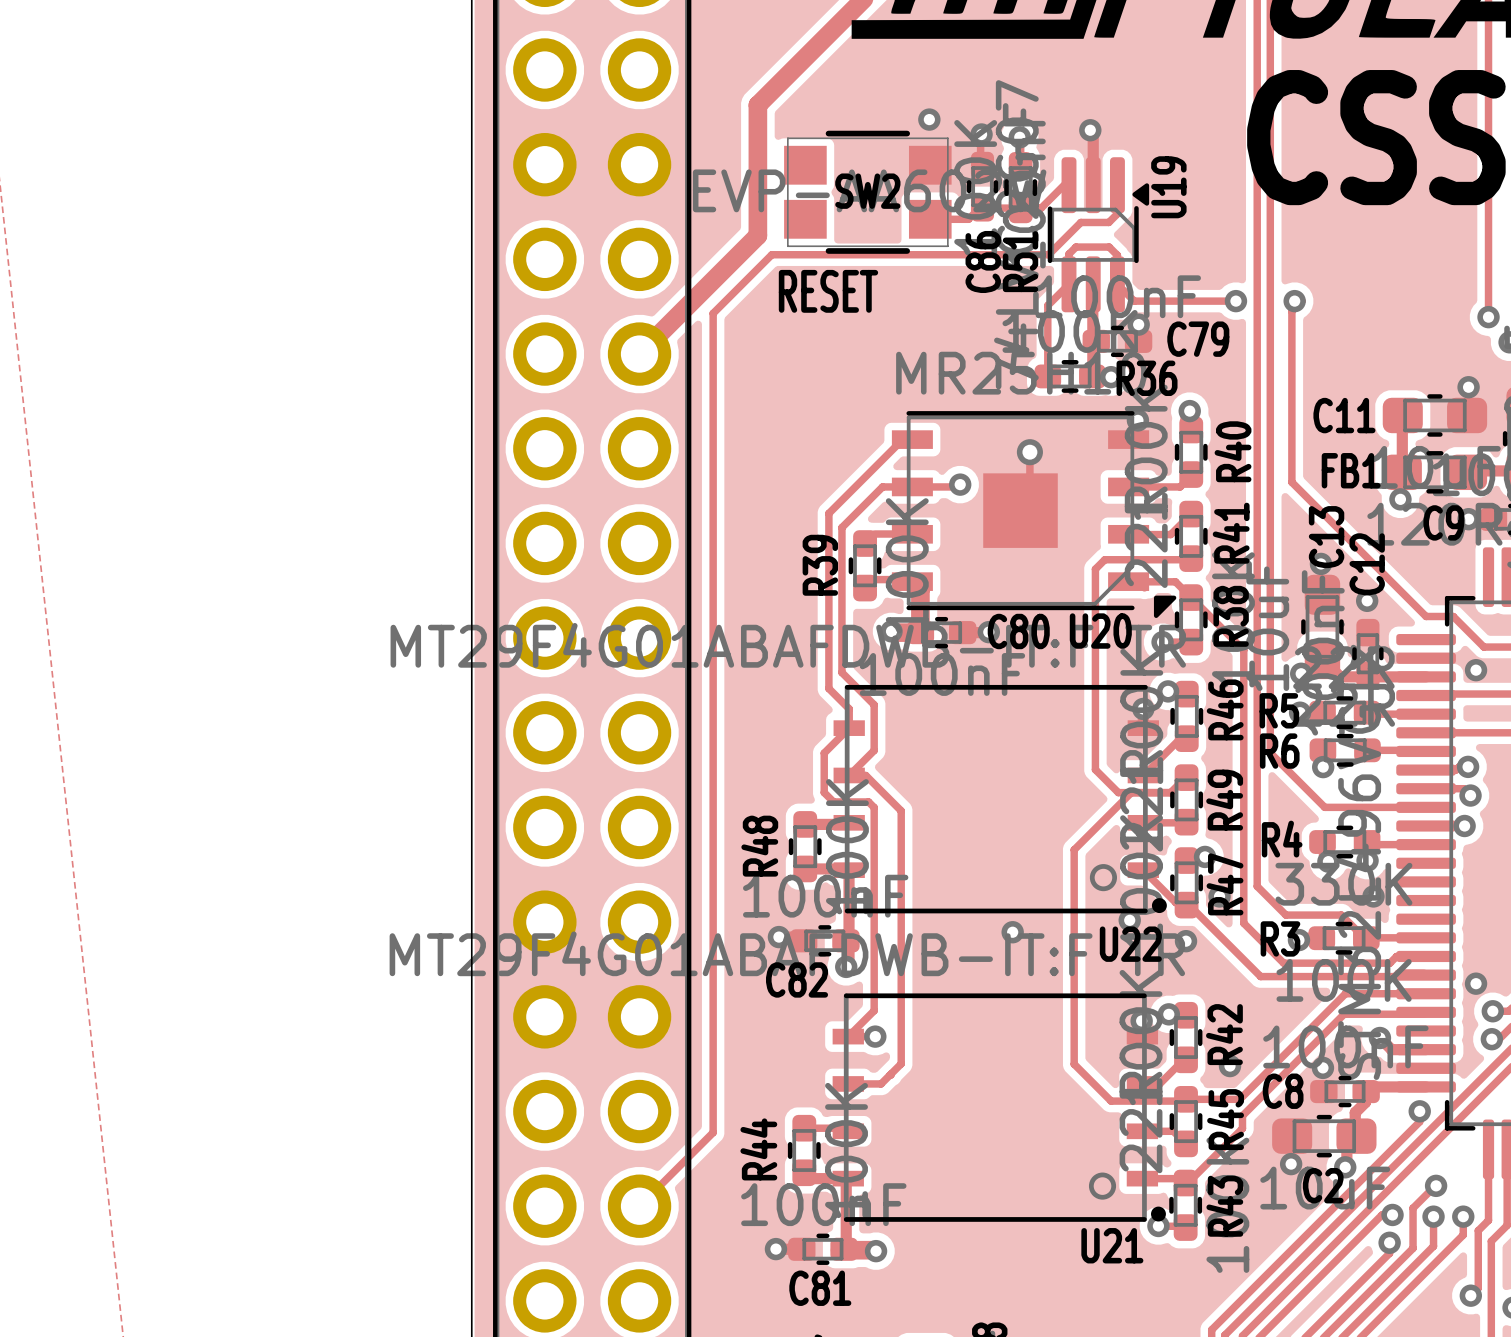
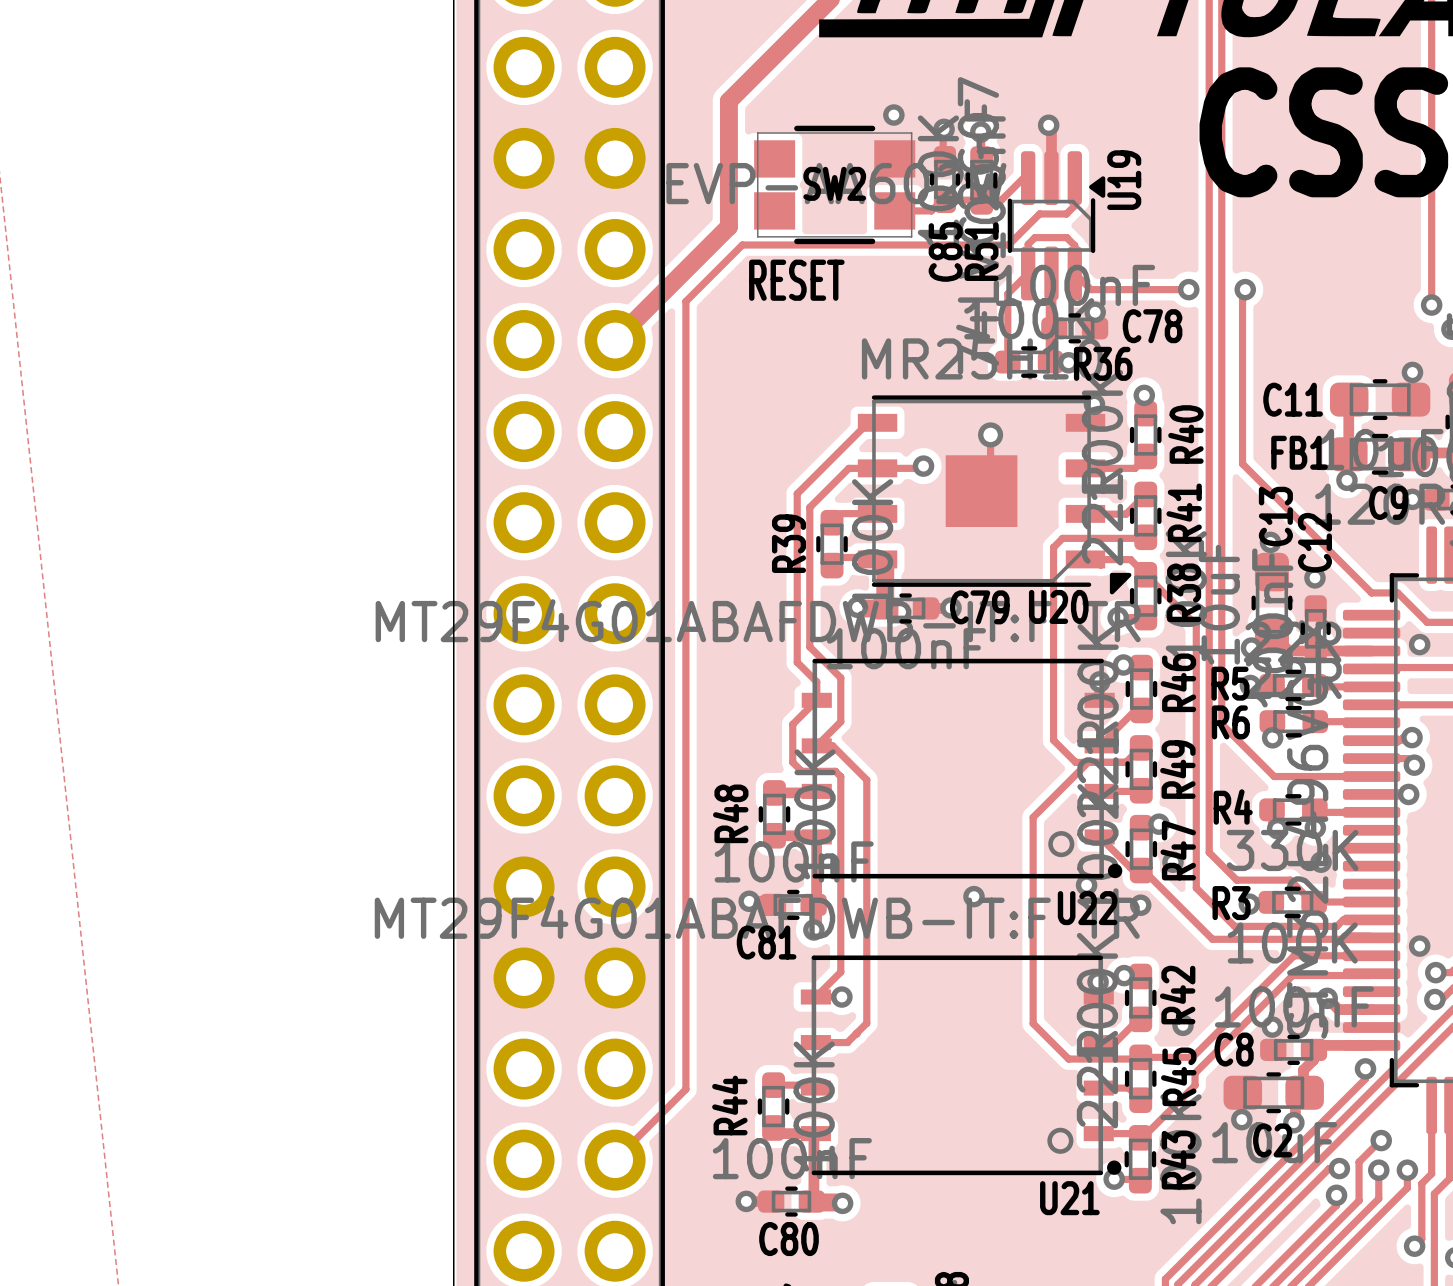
C86 name: C86 (983, 261) -> C85 (945, 251)
C79 name: C79 (1198, 339) -> C78 (1152, 326)
C80 name: C80 (1018, 631) -> C79 (979, 607)
C82 name: C82 (797, 979) -> C81 (766, 942)
C81 name: C81 (820, 1288) -> C80 (788, 1239)

